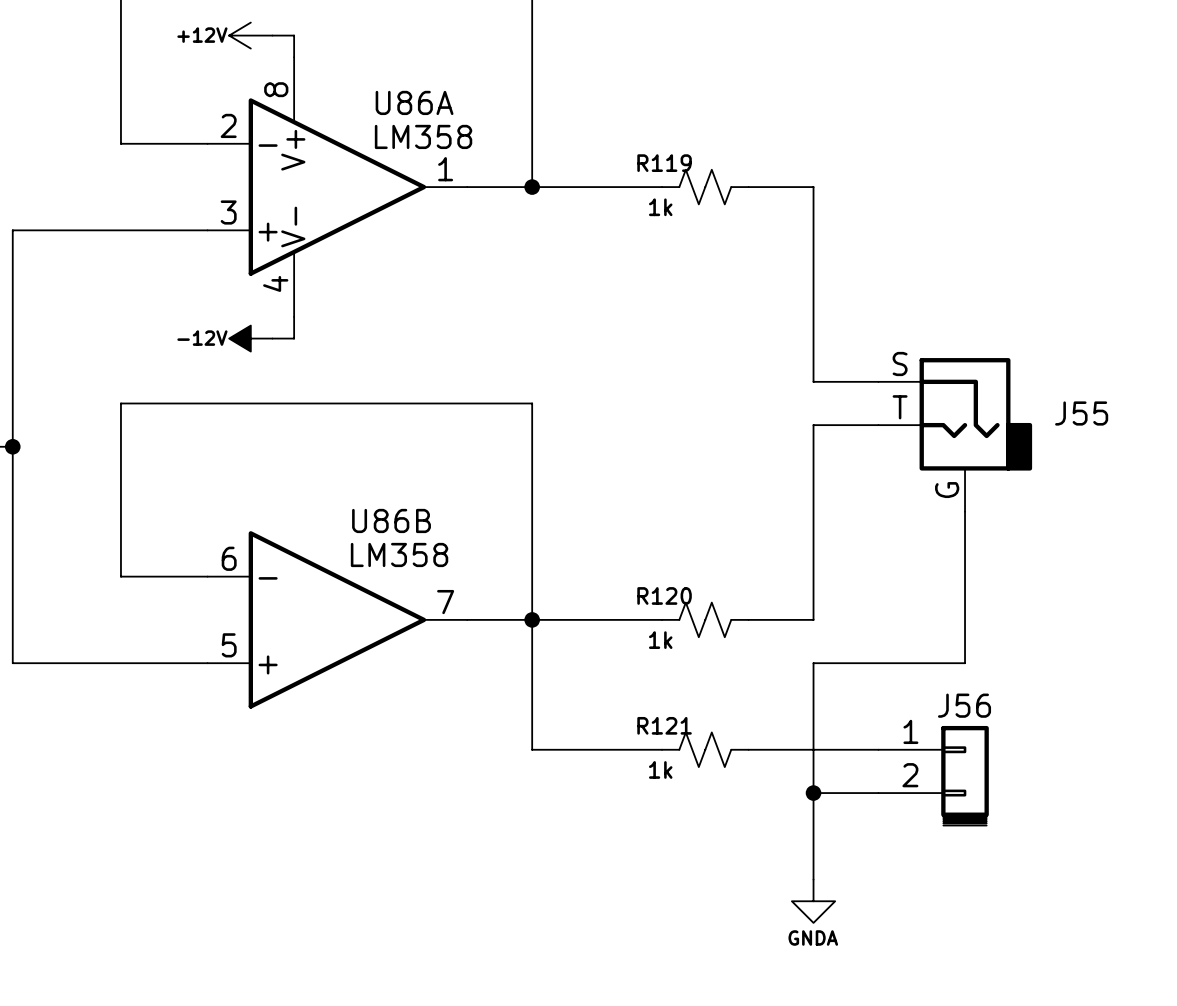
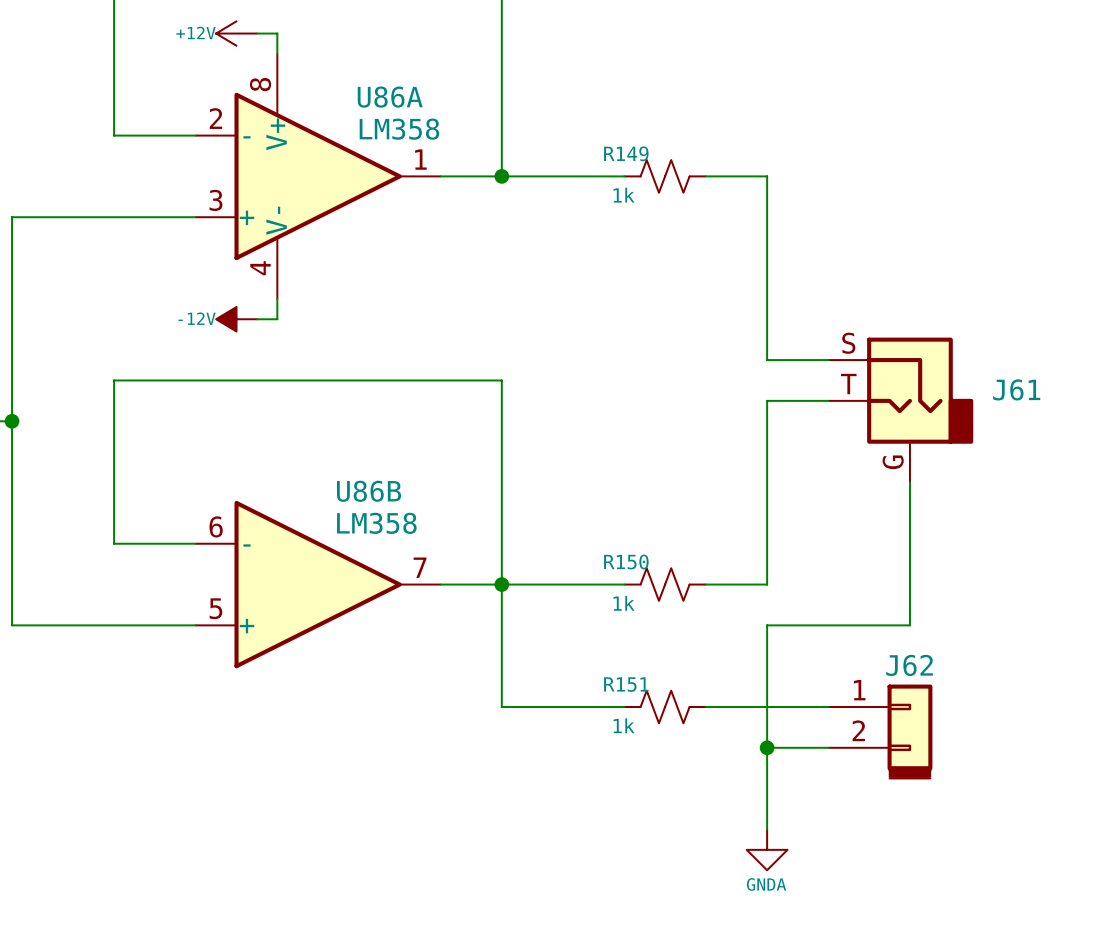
R119 name: R119 (664, 163) -> R149 (626, 153)
J55 name: J55 (1081, 413) -> J61 (1016, 389)
R120 name: R120 (664, 595) -> R150 (626, 561)
J56 name: J56 (964, 705) -> J62 (909, 665)
R121 name: R121 (664, 725) -> R151 (626, 684)

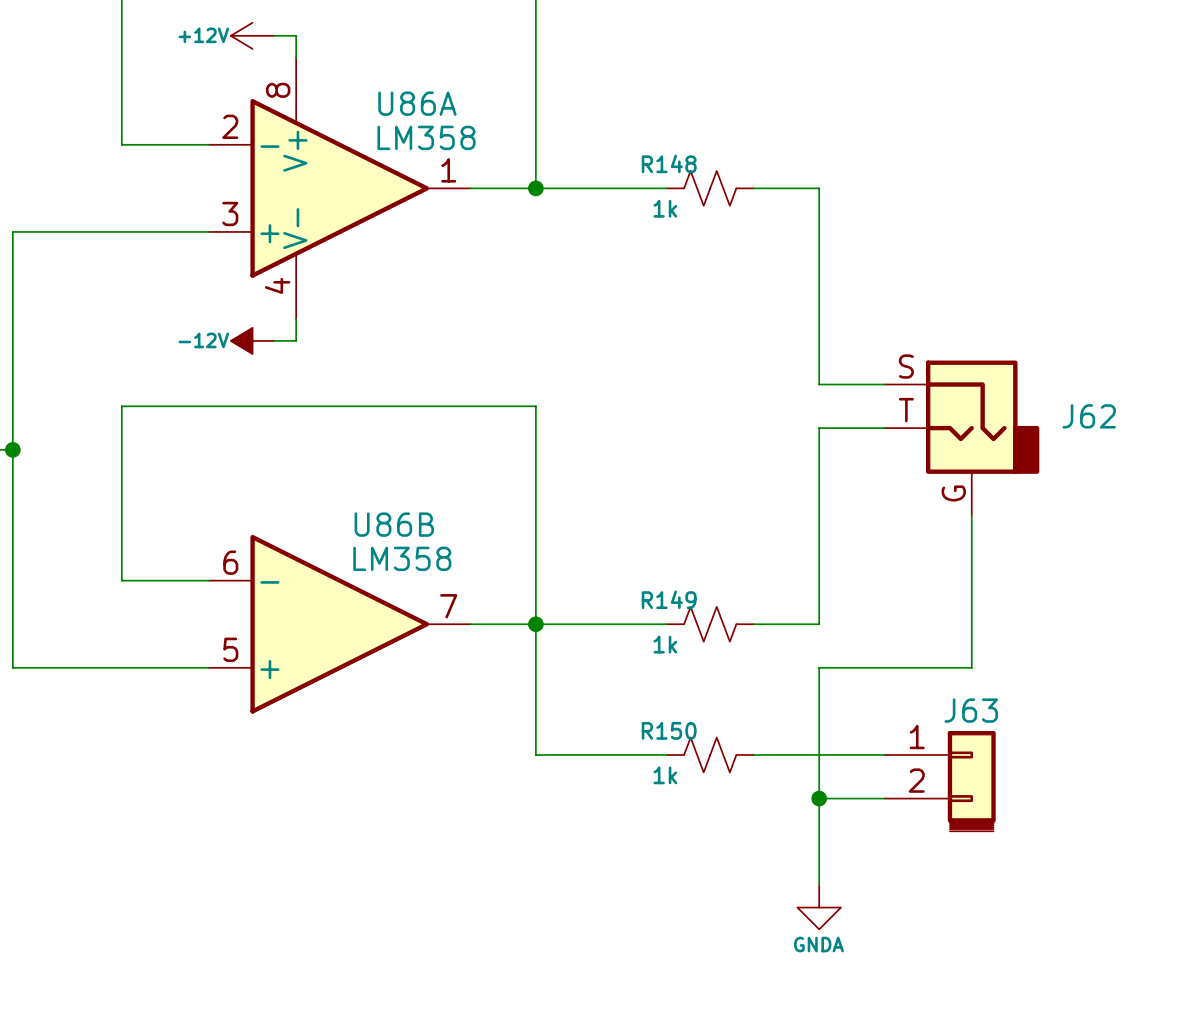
R149 name: R149 (626, 153) -> R148 (669, 163)
J61 name: J61 (1016, 389) -> J62 (1089, 416)
R150 name: R150 (626, 561) -> R149 (669, 599)
J62 name: J62 (909, 665) -> J63 (971, 710)
R151 name: R151 (626, 684) -> R150 (669, 730)

